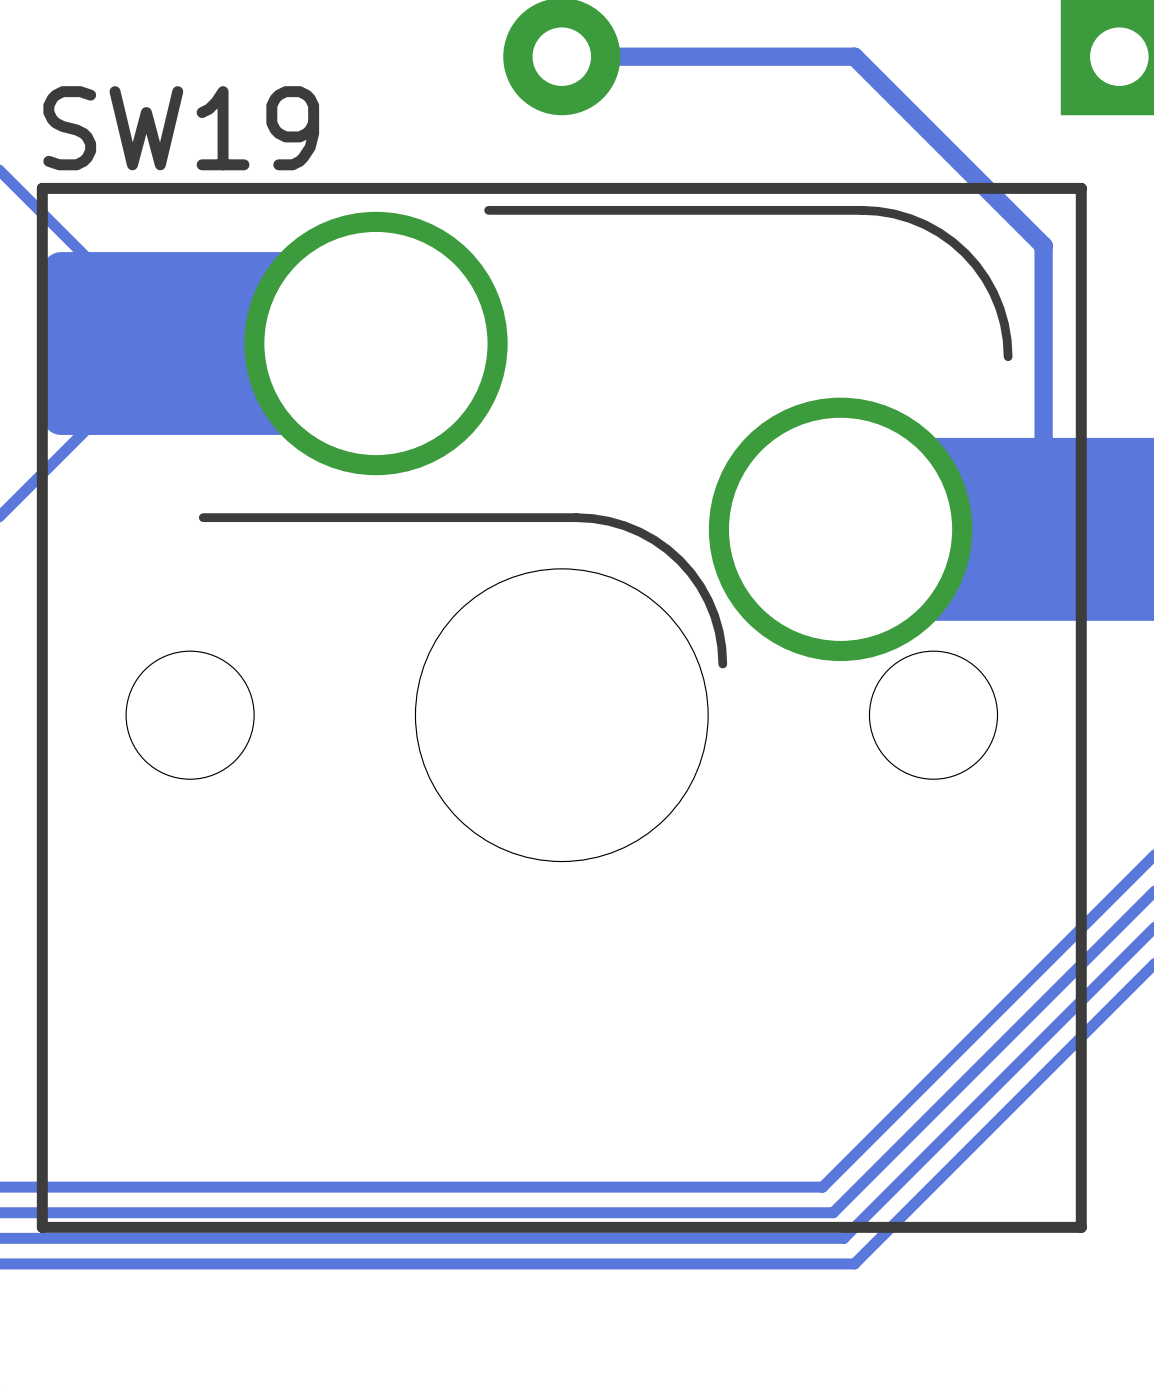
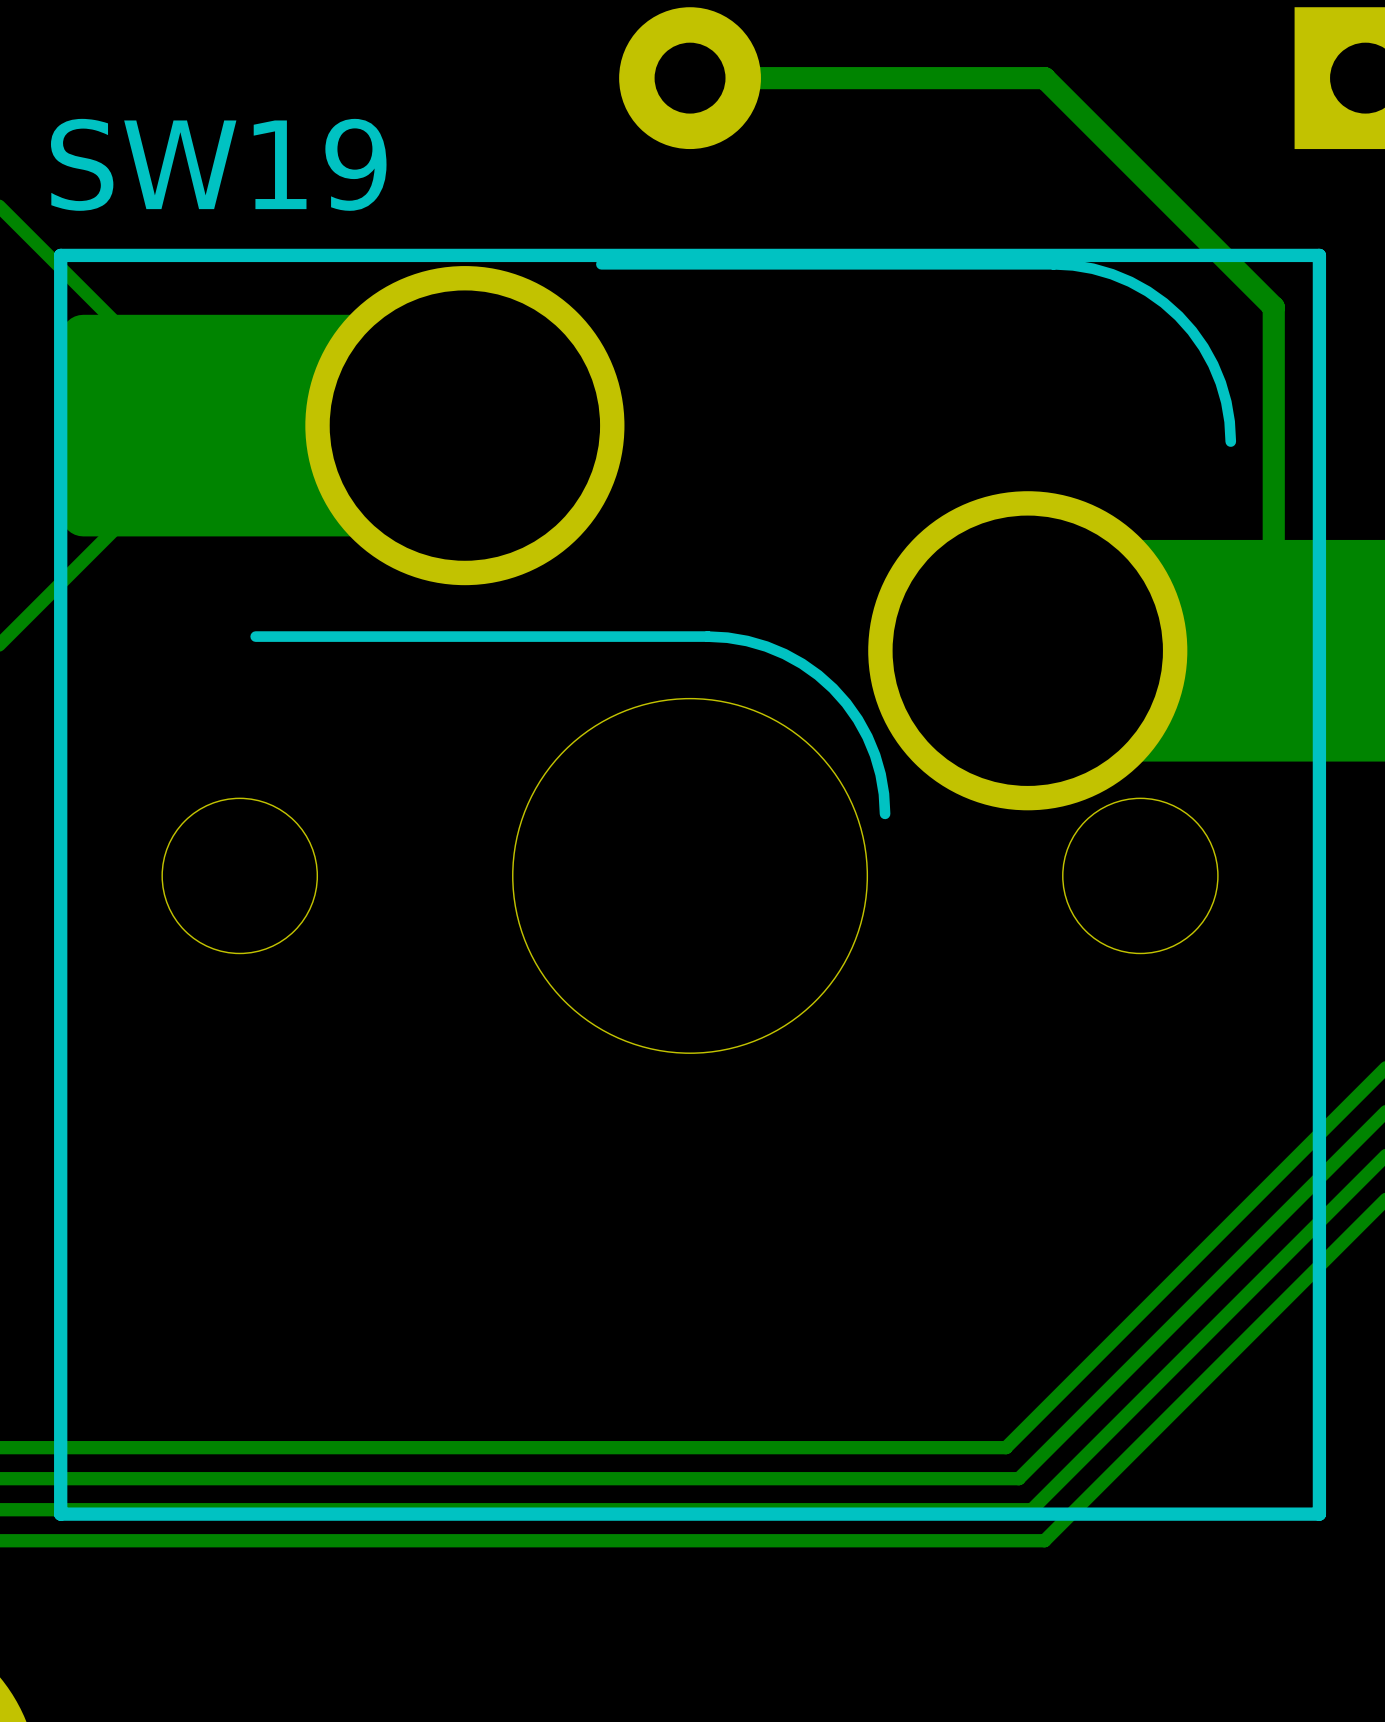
line: (1081, 203) (1081, 188) (42, 188) (42, 203) -> (1319, 255) (60, 255)
line: (1081, 1227) (42, 1227) -> (1319, 1496) (1319, 1514) (60, 1514) (60, 1496)

